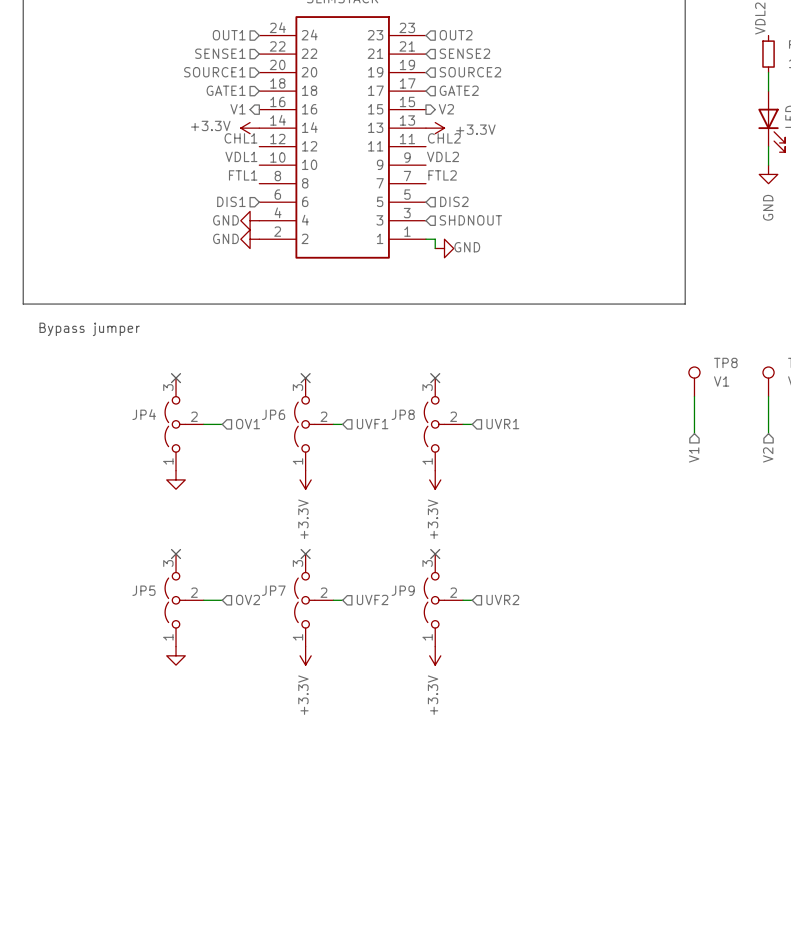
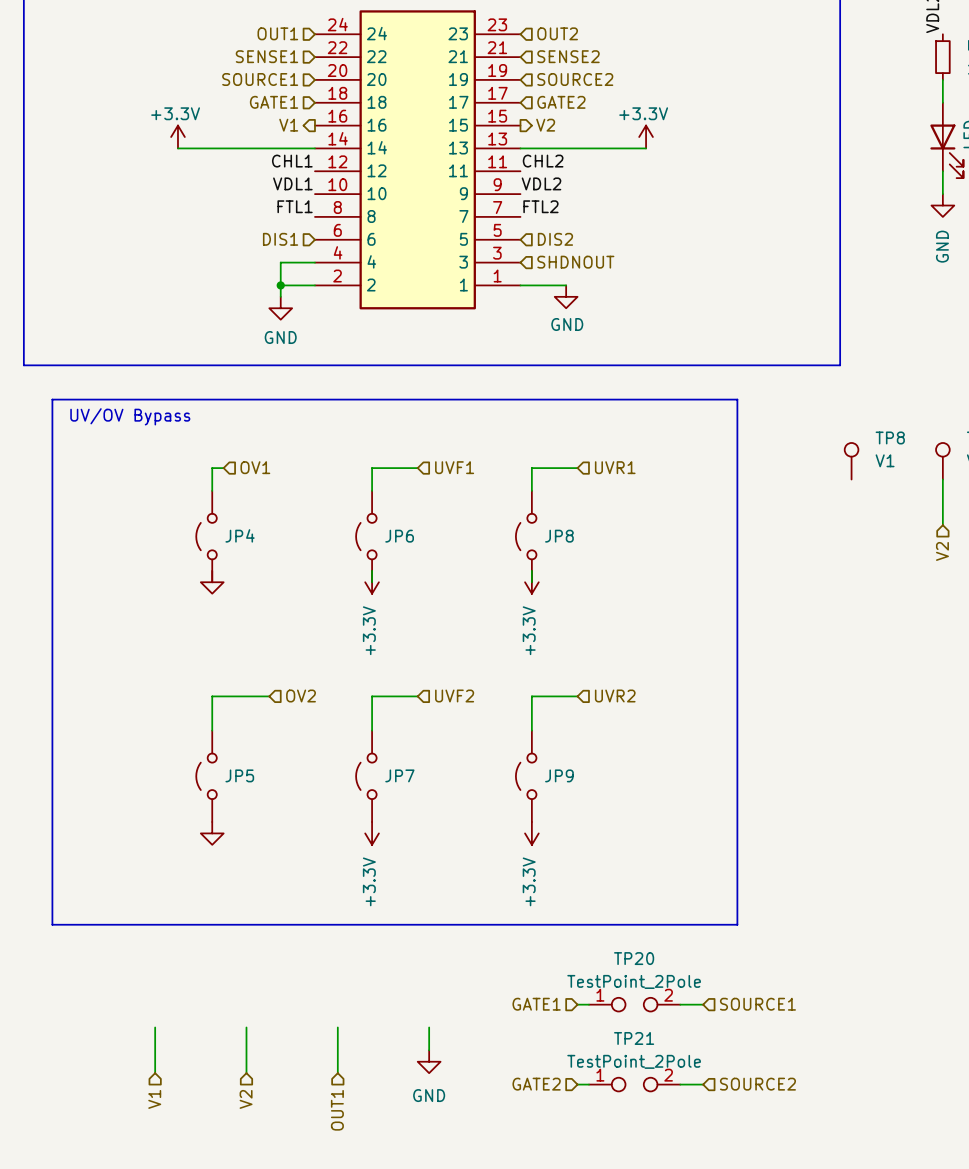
power symbol text position: +3.3V (210, 125) -> +3.3V (175, 113)
wire: none -> (177, 148) (314, 148)
power symbol rotation: 0° (250, 128) -> 90° clockwise (177, 137)
power symbol position: +3.3V (250, 128) -> +3.3V (177, 137)
wire: none -> (520, 148) (646, 148)
power symbol rotation: 0° (435, 128) -> 90° counterclockwise (646, 137)
power symbol position: +3.3V (435, 128) -> +3.3V (646, 137)
power symbol text position: +3.3V (475, 129) -> +3.3V (643, 113)
power symbol: GND (250, 220) -> none
wire: none -> (314, 262) (280, 262) (280, 296)
junction: none -> (280, 285)
power symbol: GND (250, 239) -> none
wire: (435, 239) (435, 248) -> (531, 285) (566, 285)
power symbol rotation: 0° (444, 248) -> 90° clockwise (566, 296)
power symbol position: GND (444, 248) -> GND (566, 296)
power symbol: none -> GND (280, 308)
text: Bypass jumper (89, 329) -> none
line: none -> (52, 399) (52, 924) (737, 924) (737, 399) (52, 399)
text: none -> UV/OV Bypass (130, 416)
JP4 symbol: [165, 378, 204, 471] -> [196, 490, 217, 583]
no-connect mark: (176, 378) -> none
JP6 symbol: [294, 378, 334, 471] -> [356, 490, 377, 583]
no-connect mark: (305, 378) -> none
JP8 symbol: [424, 378, 464, 471] -> [515, 490, 537, 583]
no-connect mark: (435, 378) -> none
wire: none -> (223, 468) (212, 468) (212, 490)
wire: none -> (417, 468) (372, 468) (372, 490)
wire: none -> (577, 468) (531, 468) (531, 490)
wire: (694, 396) (694, 433) -> none
JP4 name position: JP4 (144, 414) -> JP4 (240, 535)
JP6 name position: JP6 (273, 414) -> JP6 (399, 536)
JP8 name position: JP8 (403, 414) -> JP8 (559, 536)
wire: (203, 424) (222, 424) -> none
hierarchical label position: OV1 (248, 424) -> OV1 (255, 467)
wire: (333, 424) (342, 424) -> none
hierarchical label position: UVF1 (372, 424) -> UVF1 (454, 467)
wire: (463, 424) (472, 424) -> none
hierarchical label position: UVR1 (502, 424) -> UVR1 (615, 467)
hierarchical label: V1 (694, 454) -> none
JP5 symbol: [165, 554, 204, 647] -> [196, 730, 217, 822]
no-connect mark: (176, 554) -> none
JP7 symbol: [294, 554, 334, 647] -> [356, 730, 377, 822]
no-connect mark: (305, 554) -> none
JP9 symbol: [424, 554, 464, 647] -> [515, 730, 537, 822]
no-connect mark: (435, 554) -> none
wire: none -> (269, 696) (212, 696) (212, 730)
wire: none -> (417, 696) (372, 696) (372, 730)
wire: none -> (577, 696) (531, 696) (531, 730)
JP5 name position: JP5 (143, 590) -> JP5 (239, 775)
JP7 name position: JP7 (273, 590) -> JP7 (399, 775)
JP9 name position: JP9 (403, 590) -> JP9 (559, 775)
hierarchical label position: OV2 (248, 599) -> OV2 (301, 695)
hierarchical label position: UVF2 (372, 599) -> UVF2 (454, 695)
hierarchical label position: UVR2 (502, 599) -> UVR2 (615, 695)
wire: (203, 600) (222, 600) -> none
wire: (333, 600) (342, 600) -> none
wire: (463, 600) (472, 600) -> none
power symbol position: (176, 655) -> (212, 833)
power symbol position: +3.3V (305, 655) -> +3.3V (372, 833)
power symbol position: +3.3V (435, 655) -> +3.3V (531, 833)
hierarchical label: none -> GATE1 (536, 1004)
wire: none -> (577, 1004) (588, 1004)
TP20: none -> TestPoint_2Pole (634, 1004)
wire: none -> (680, 1004) (703, 1004)
hierarchical label: none -> SOURCE1 (757, 1004)
wire: none -> (155, 1027) (155, 1073)
wire: none -> (246, 1027) (246, 1073)
wire: none -> (337, 1027) (337, 1073)
wire: none -> (429, 1027) (429, 1050)
power symbol: none -> GND (429, 1061)
hierarchical label: none -> GATE2 (536, 1084)
hierarchical label: none -> SOURCE2 (757, 1084)
wire: none -> (577, 1084) (588, 1084)
TP21: none -> TestPoint_2Pole (634, 1084)
wire: none -> (680, 1084) (703, 1084)
hierarchical label: none -> V1 (154, 1099)
hierarchical label: none -> V2 (246, 1099)
hierarchical label: none -> OUT1 (337, 1110)

